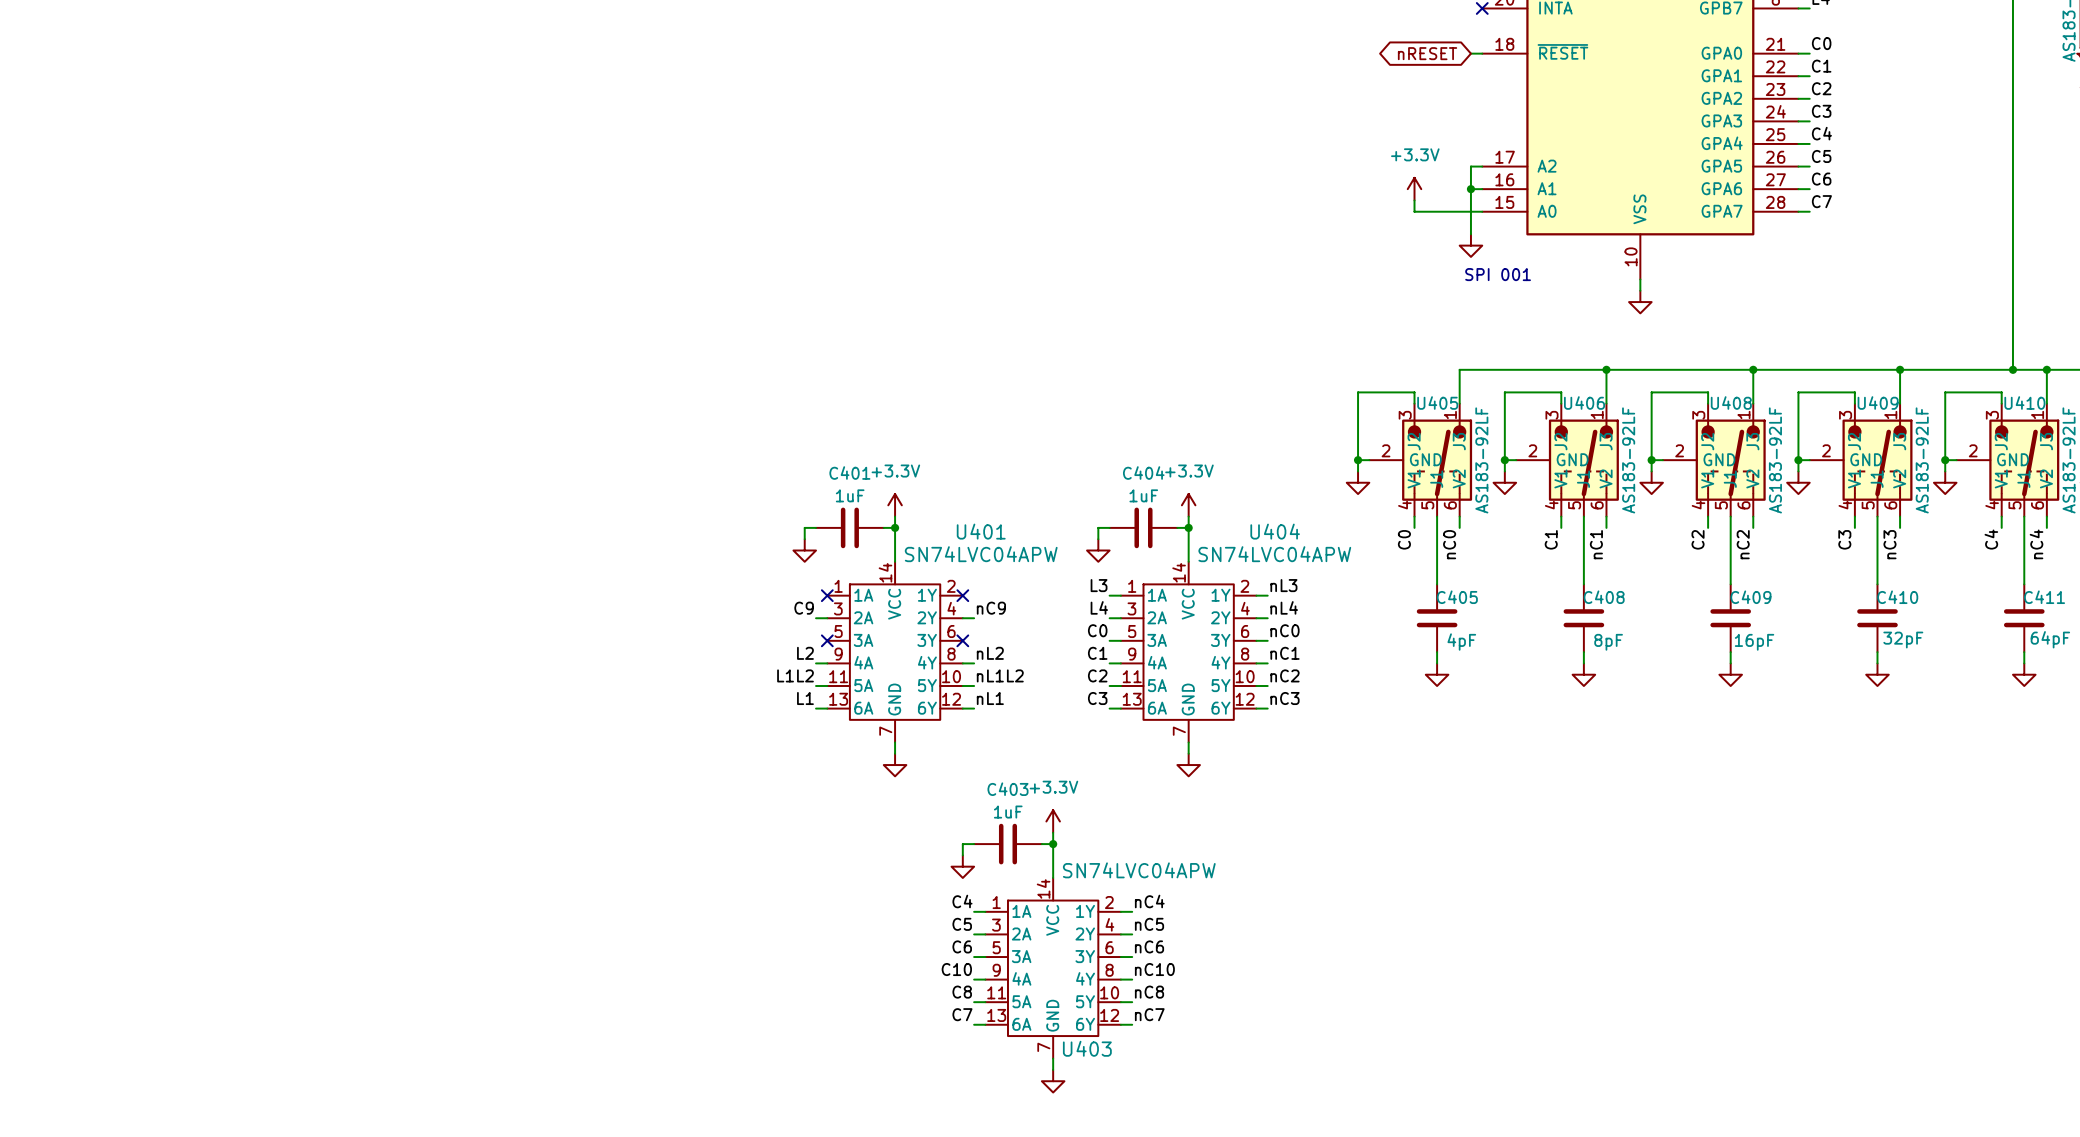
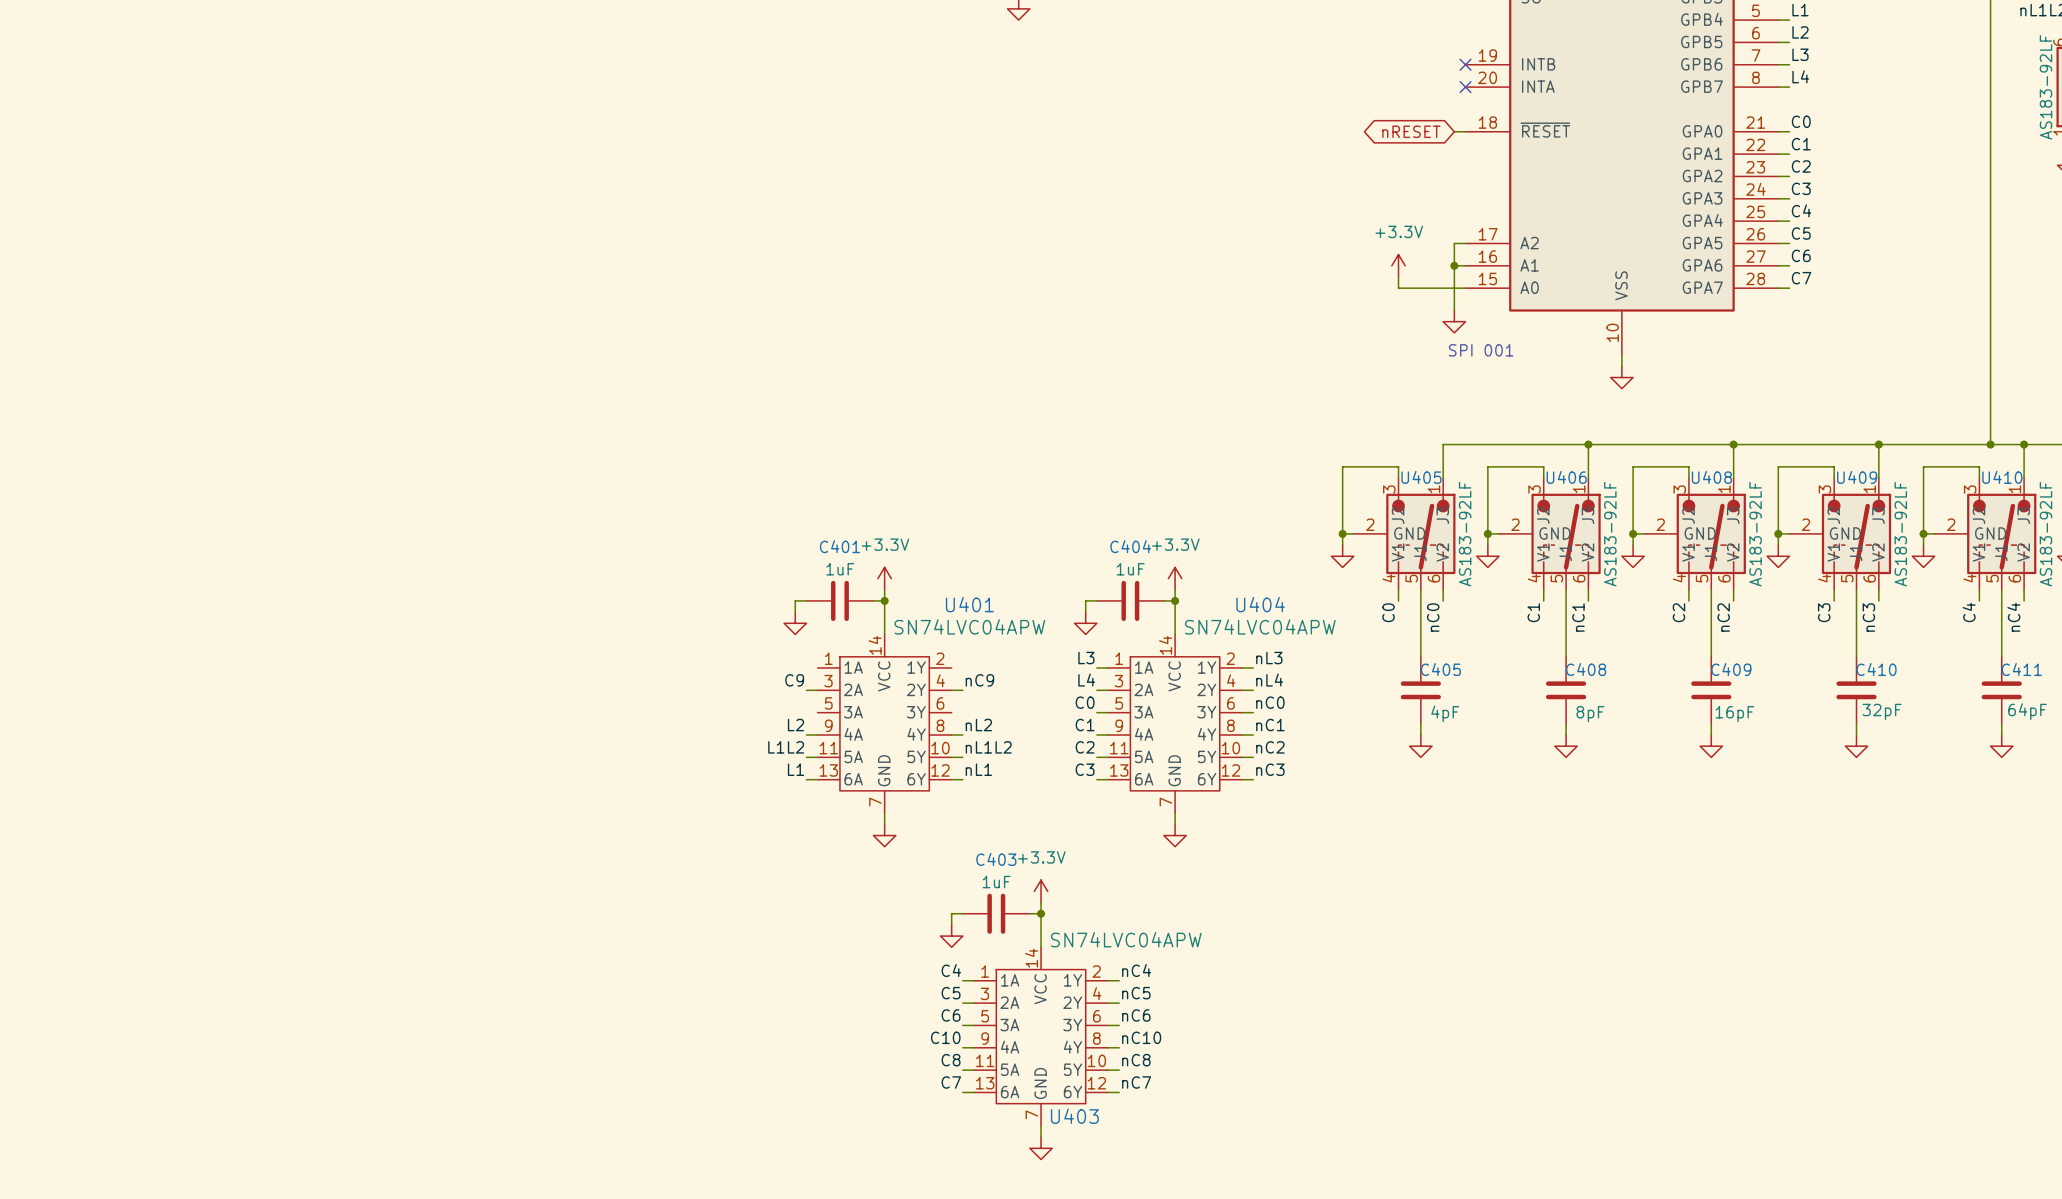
no-connect mark: (827, 595) -> none
no-connect mark: (962, 595) -> none
no-connect mark: (827, 640) -> none
no-connect mark: (962, 640) -> none

